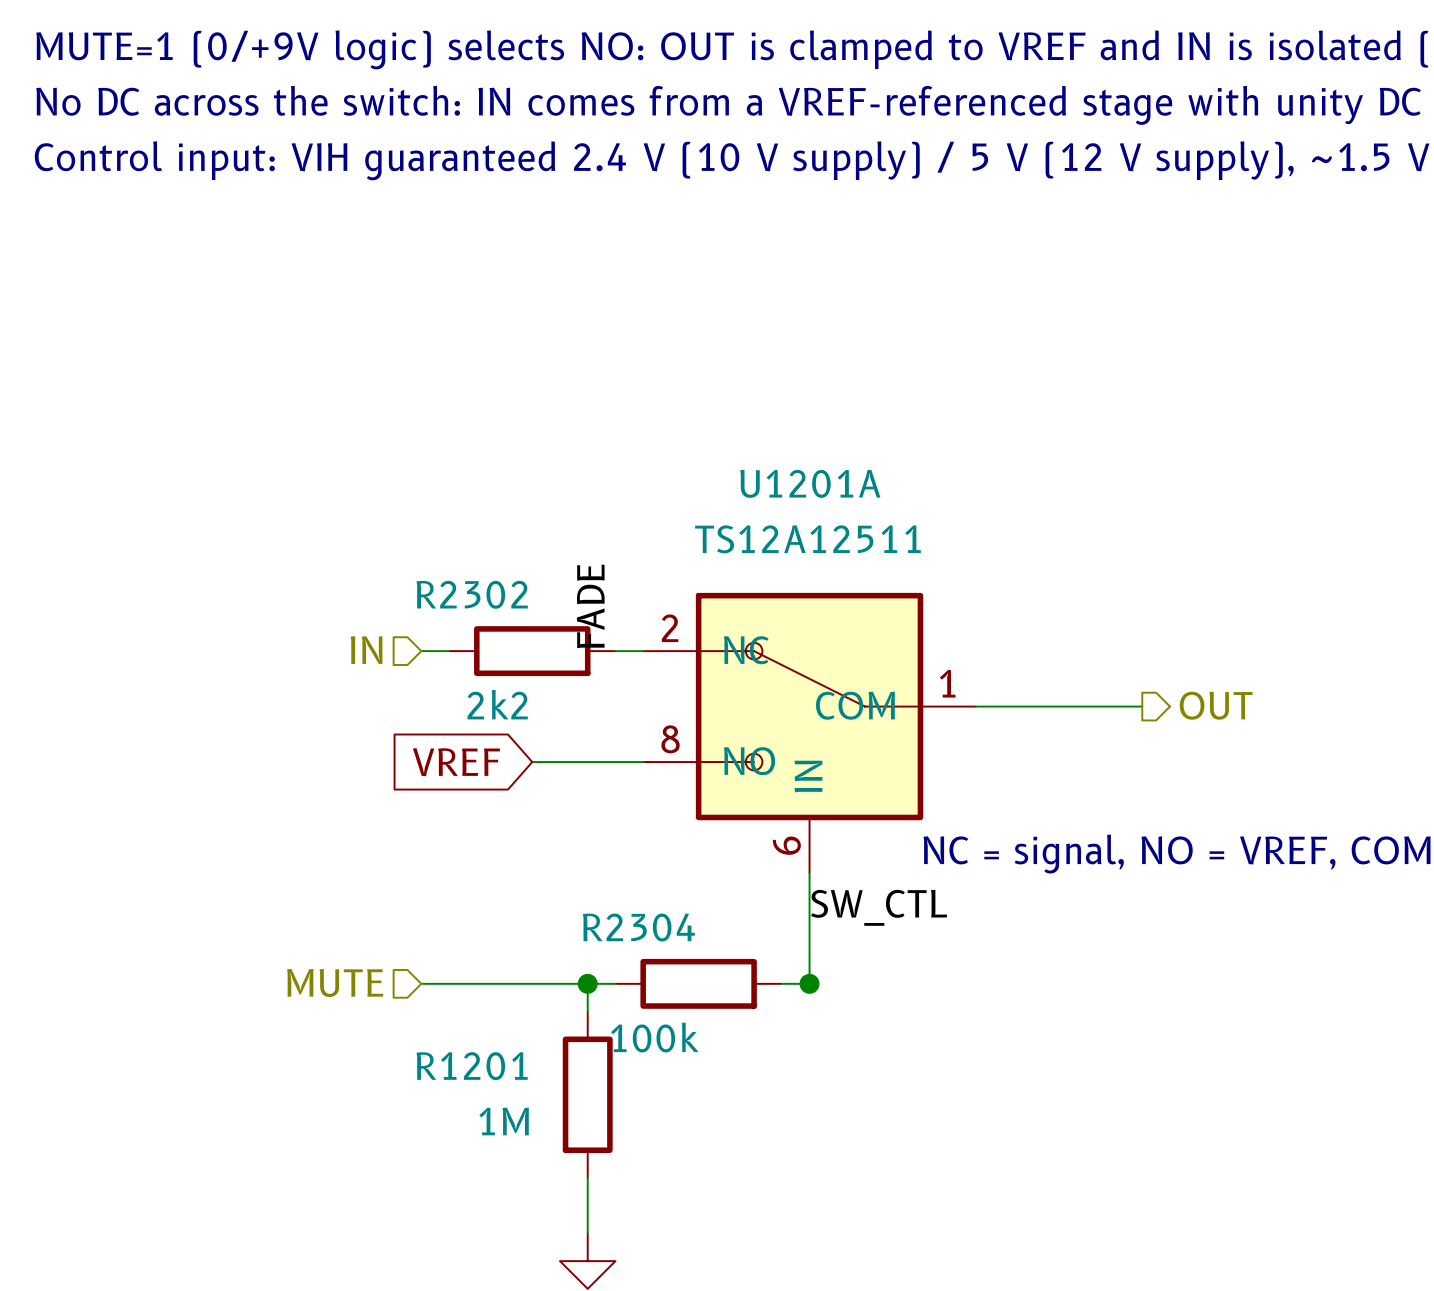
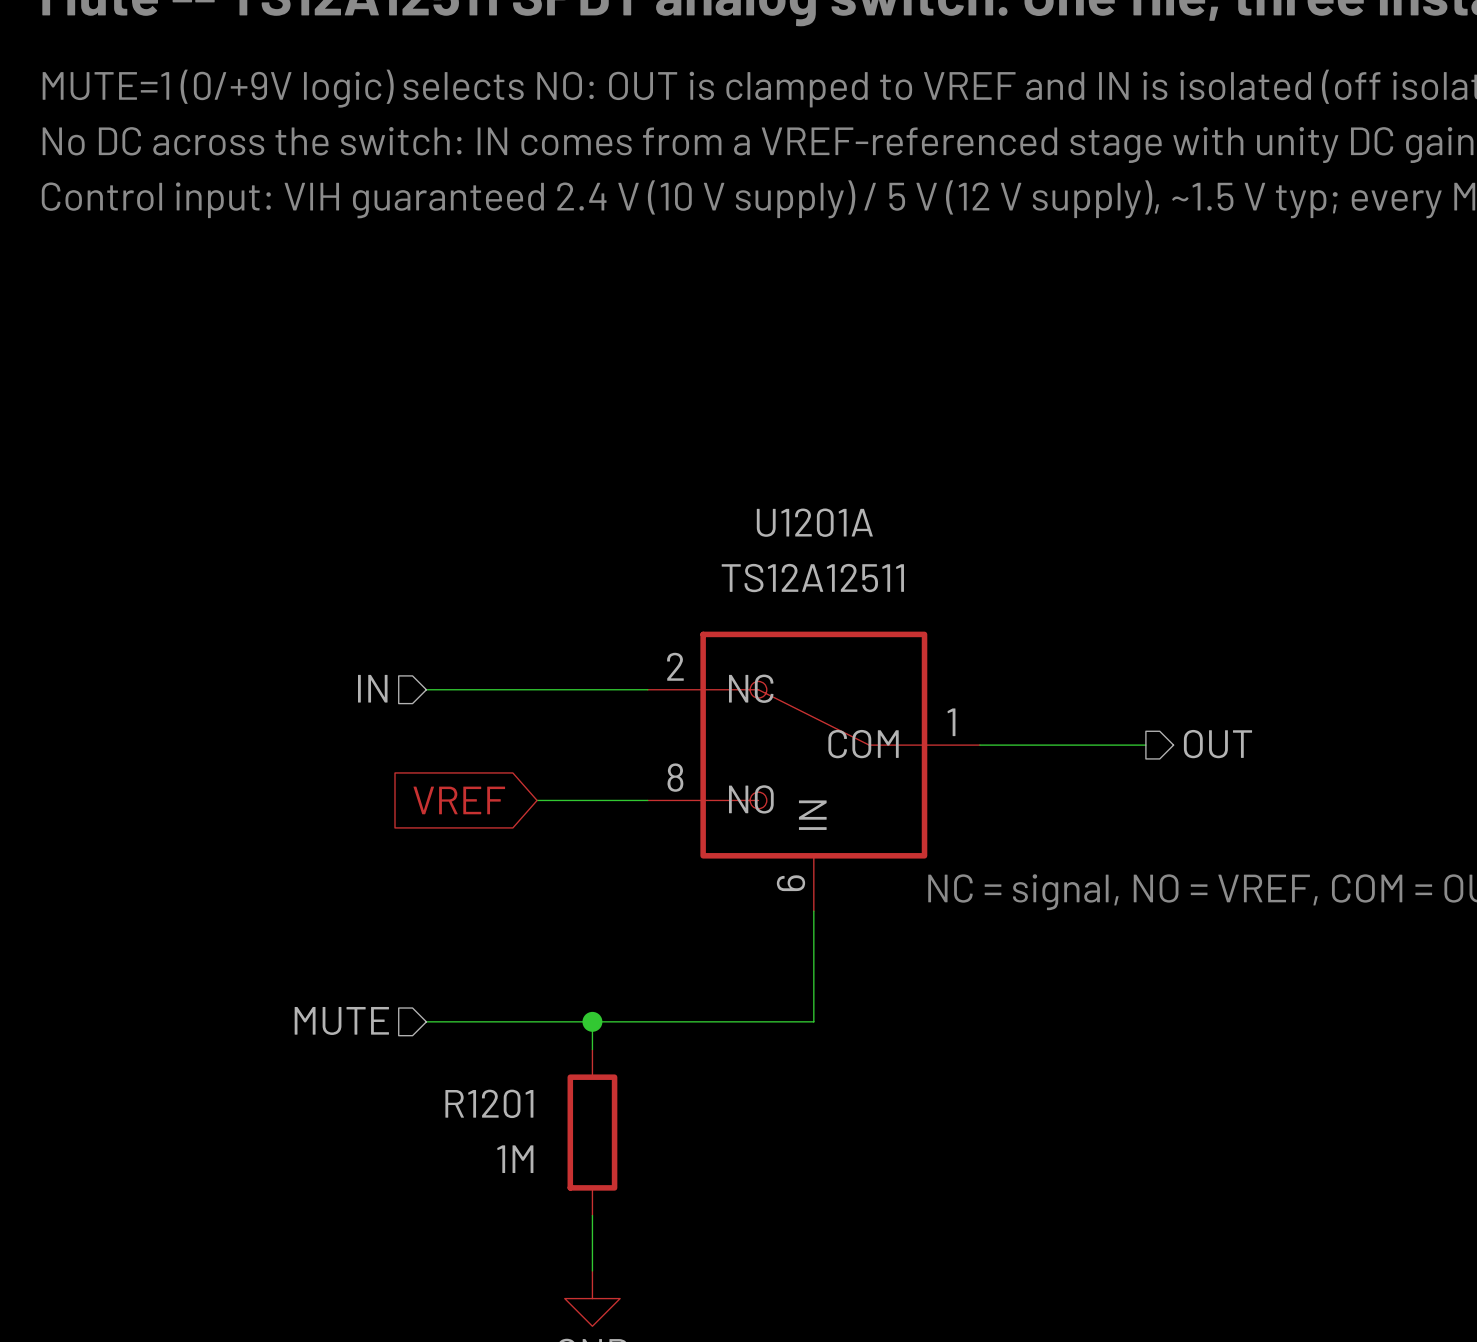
label: FADE (590, 606) -> none
wire: none -> (454, 689) (620, 689)
R2302: 2k2 (532, 651) -> none
label: SW_CTL (879, 907) -> none
wire: none -> (620, 1021) (786, 1021)
R2304: 100k (698, 983) -> none
junction: (809, 983) -> none

